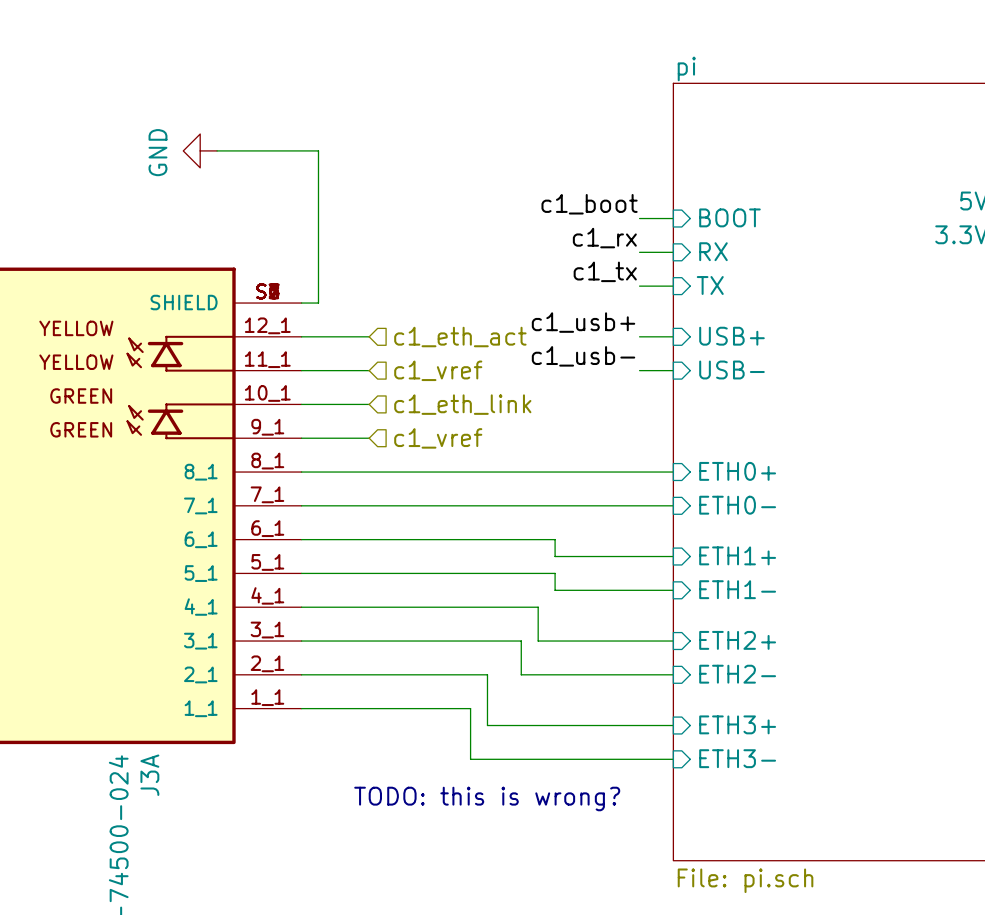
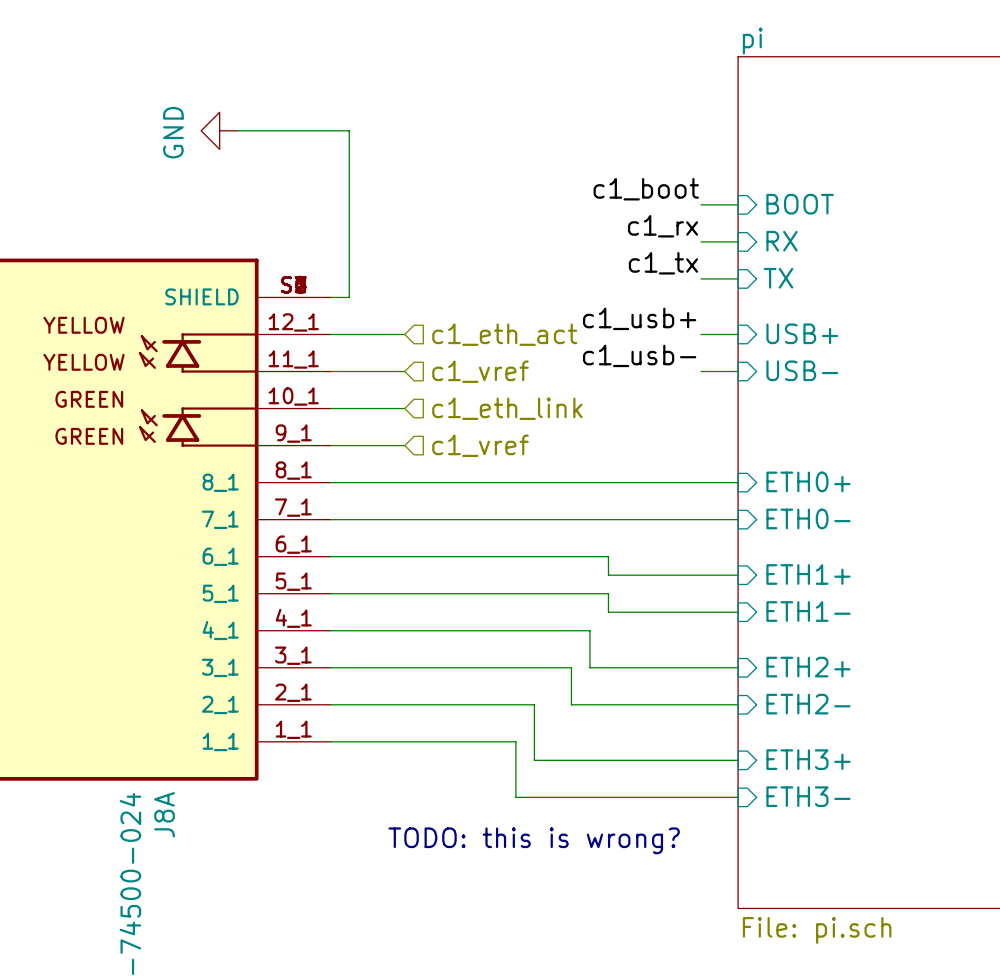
J3A name: J3A (149, 775) -> J8A (164, 814)

